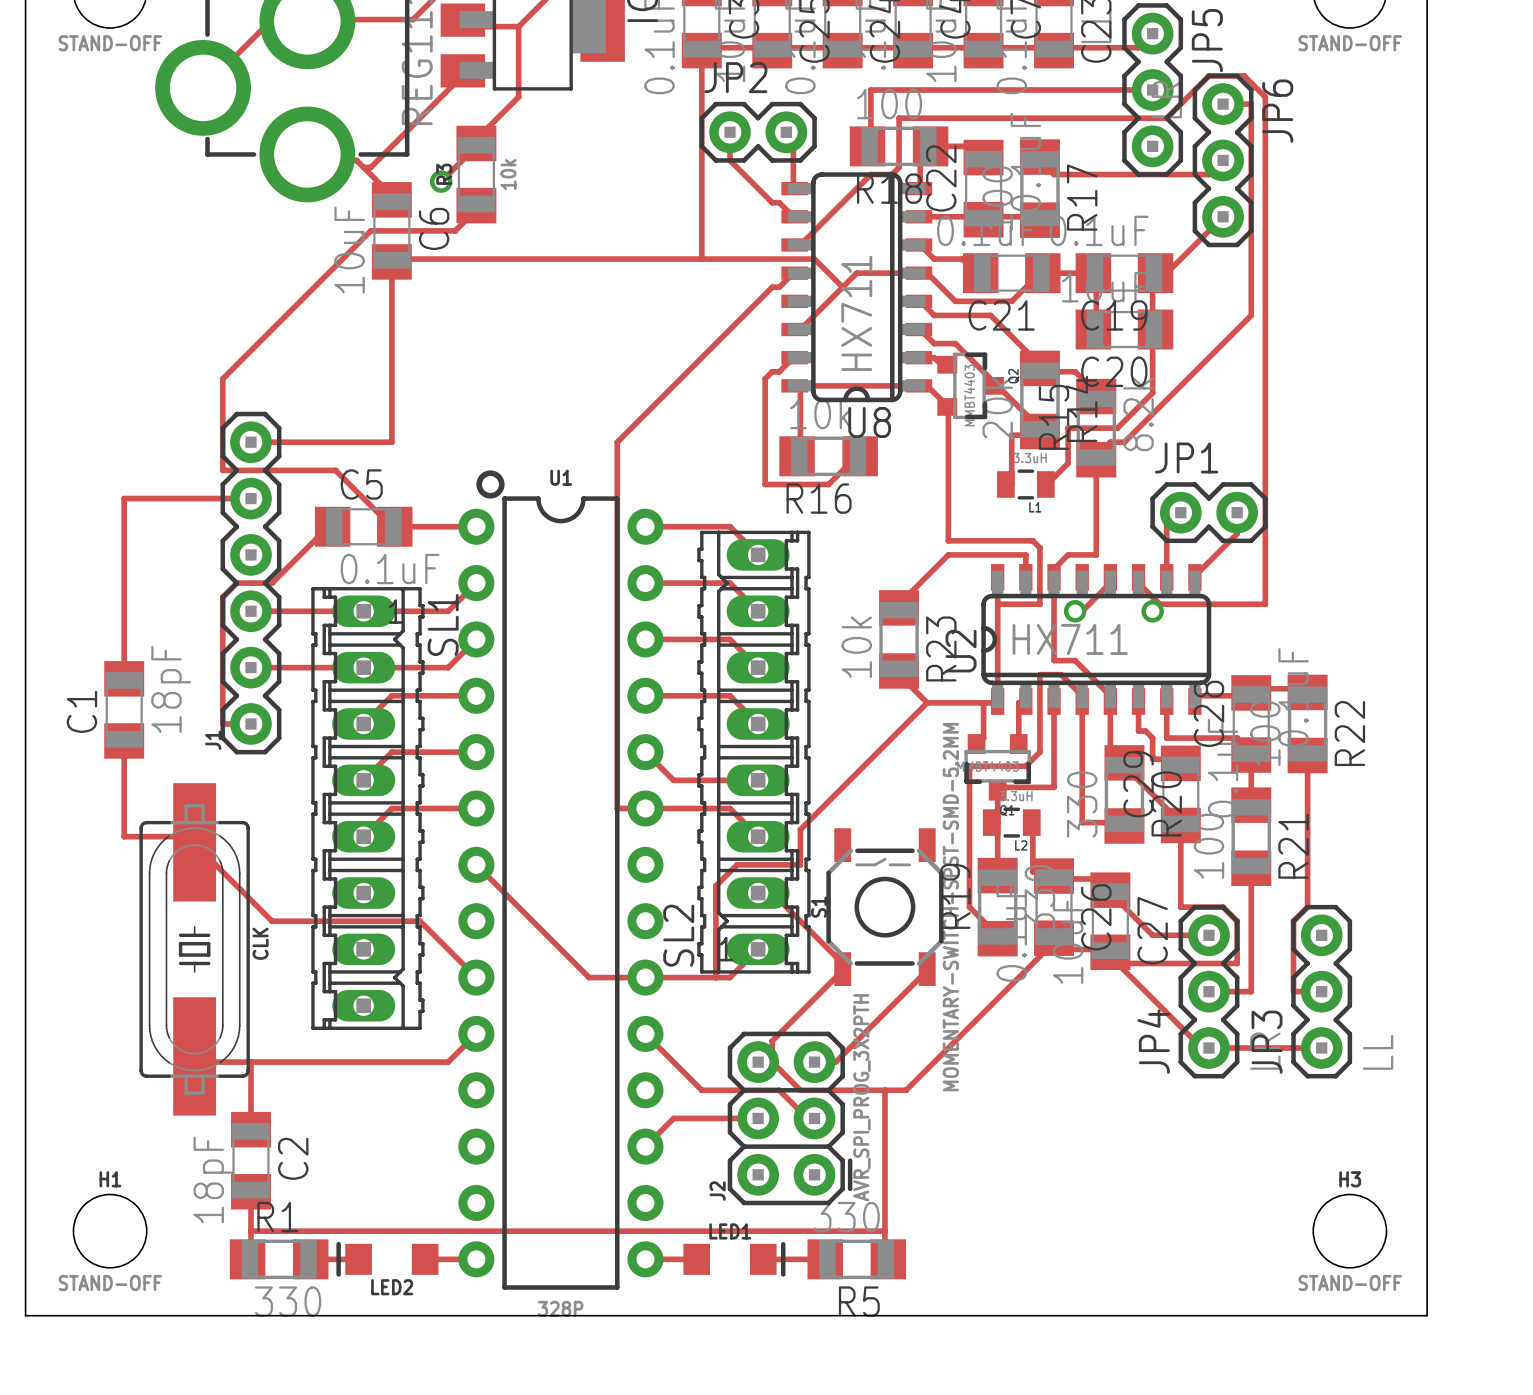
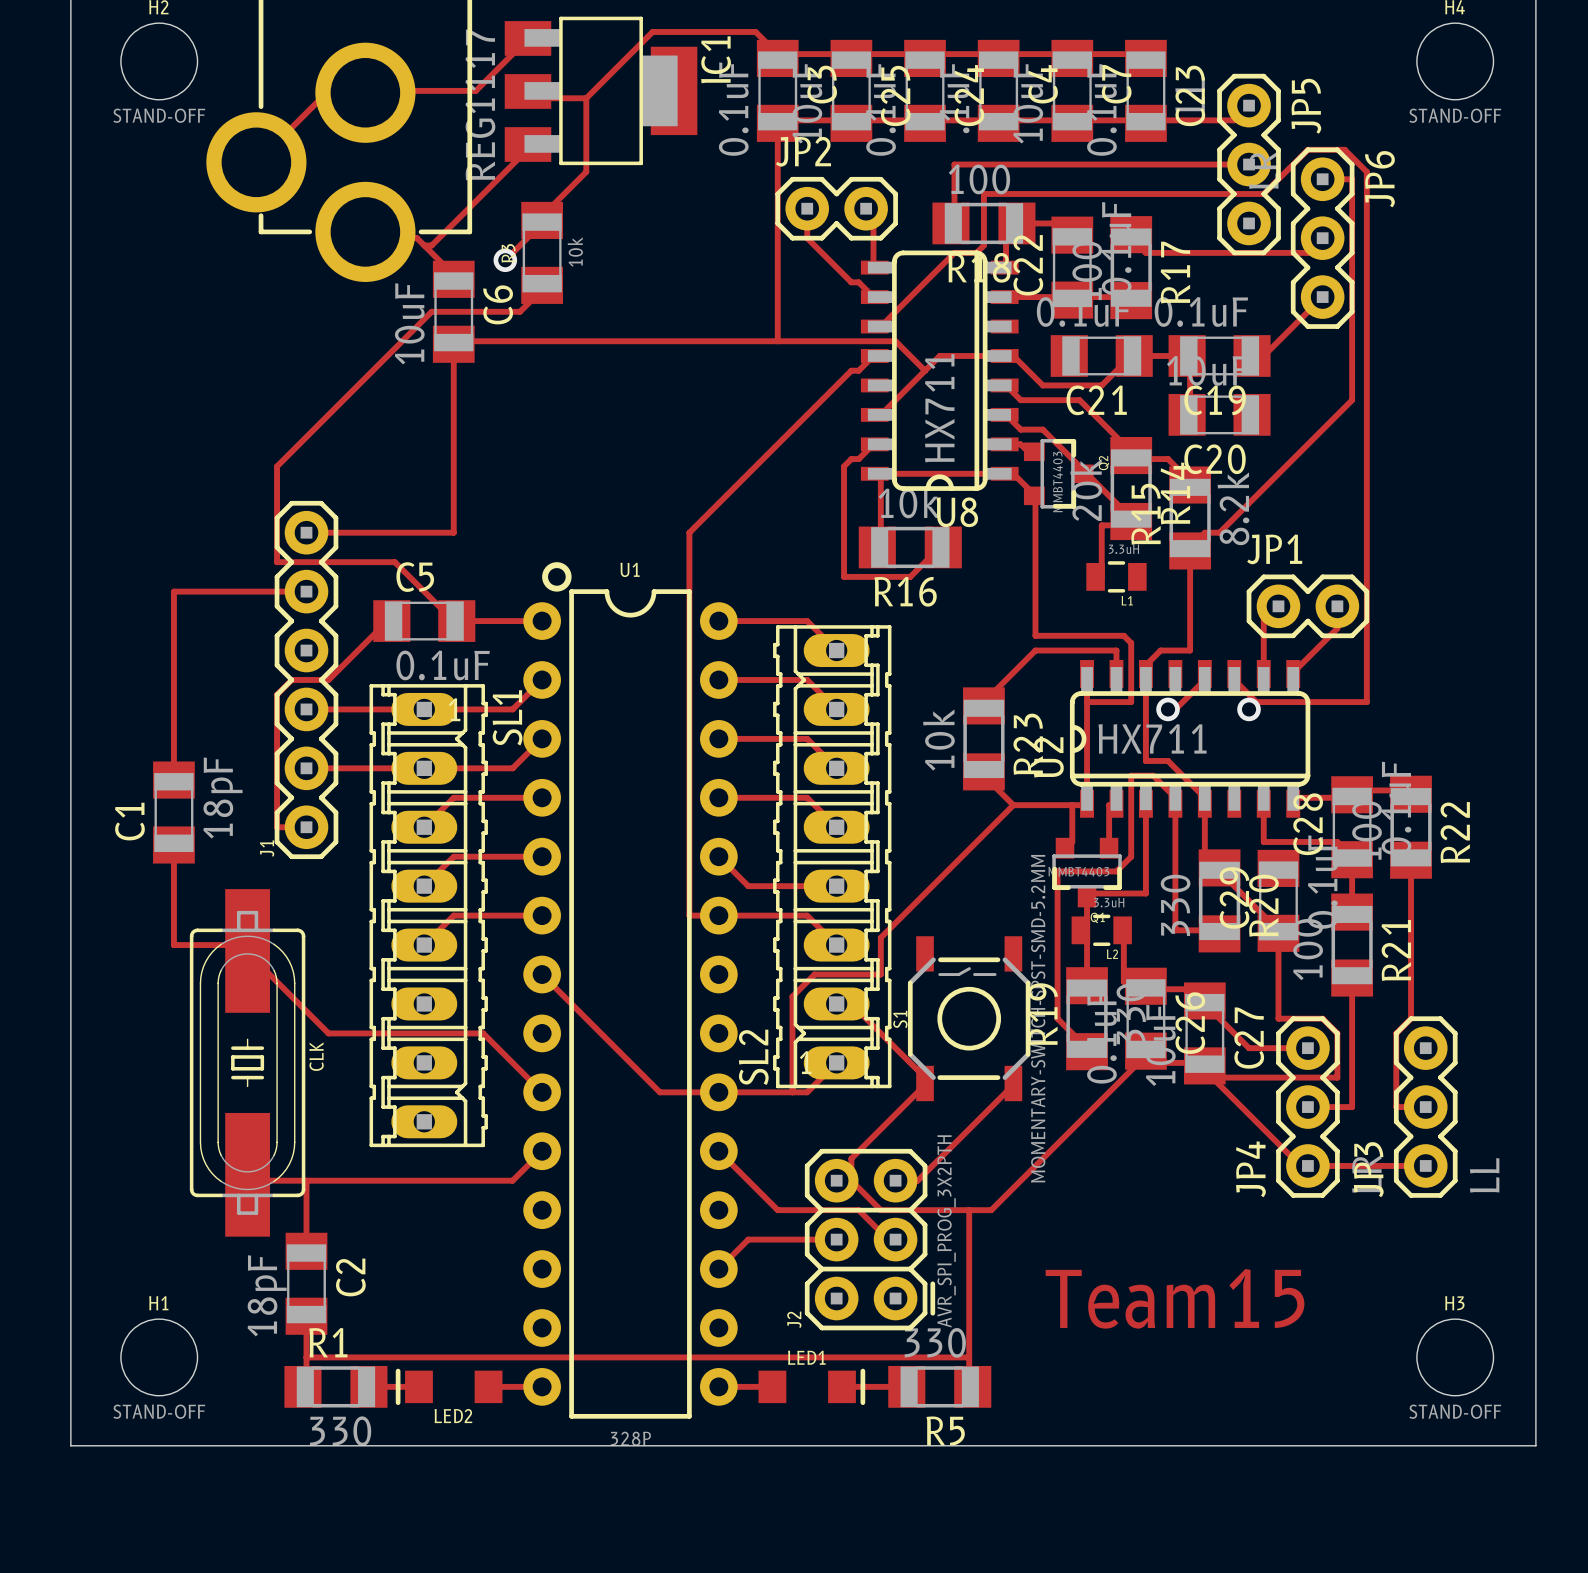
track: (918, 244) (934, 259) (962, 259) (976, 273) (980, 273) -> none
track: (1166, 273) (1152, 273) (1152, 392) (1117, 428) (1068, 428) (1068, 463) (1045, 484) -> none
track: (1138, 701) (1138, 731) (1145, 731) (1152, 738) (1152, 759) (1180, 759) (1180, 763) -> none
text: none -> Team15 (1175, 1298)

